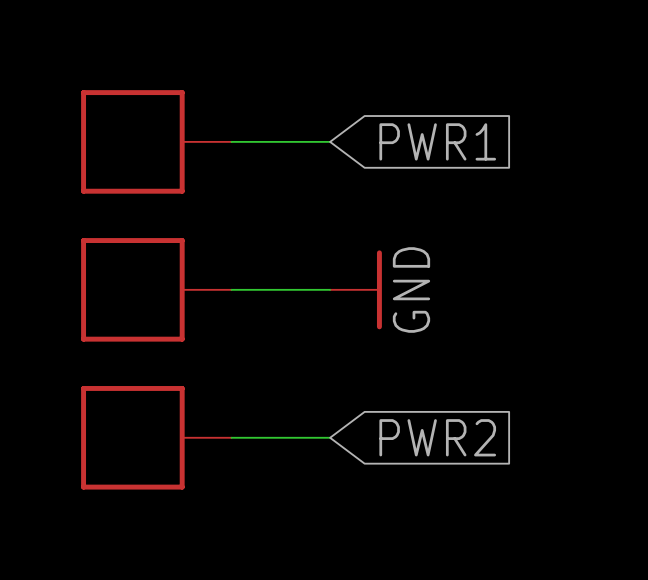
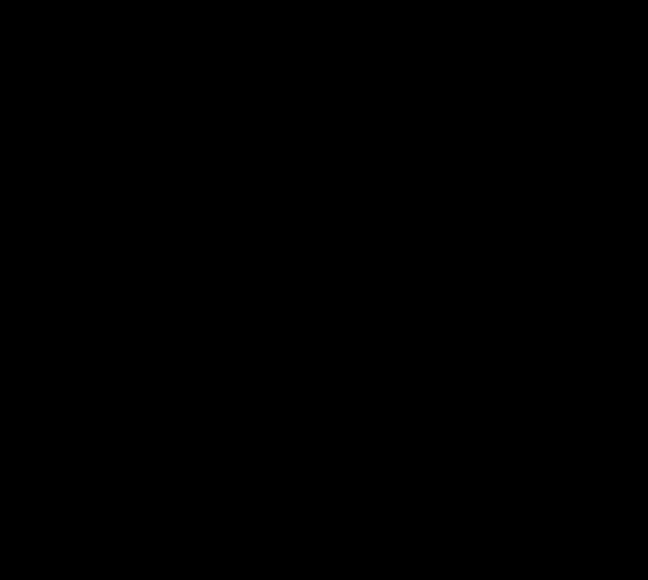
part: (156, 141) -> none
wire: (231, 141) (330, 141) -> none
global label: PWR1 (437, 141) -> none
part: (156, 289) -> none
wire: (231, 289) (330, 289) -> none
power symbol: GND (356, 289) -> none
part: (156, 437) -> none
wire: (231, 437) (330, 437) -> none
global label: PWR2 (437, 437) -> none

